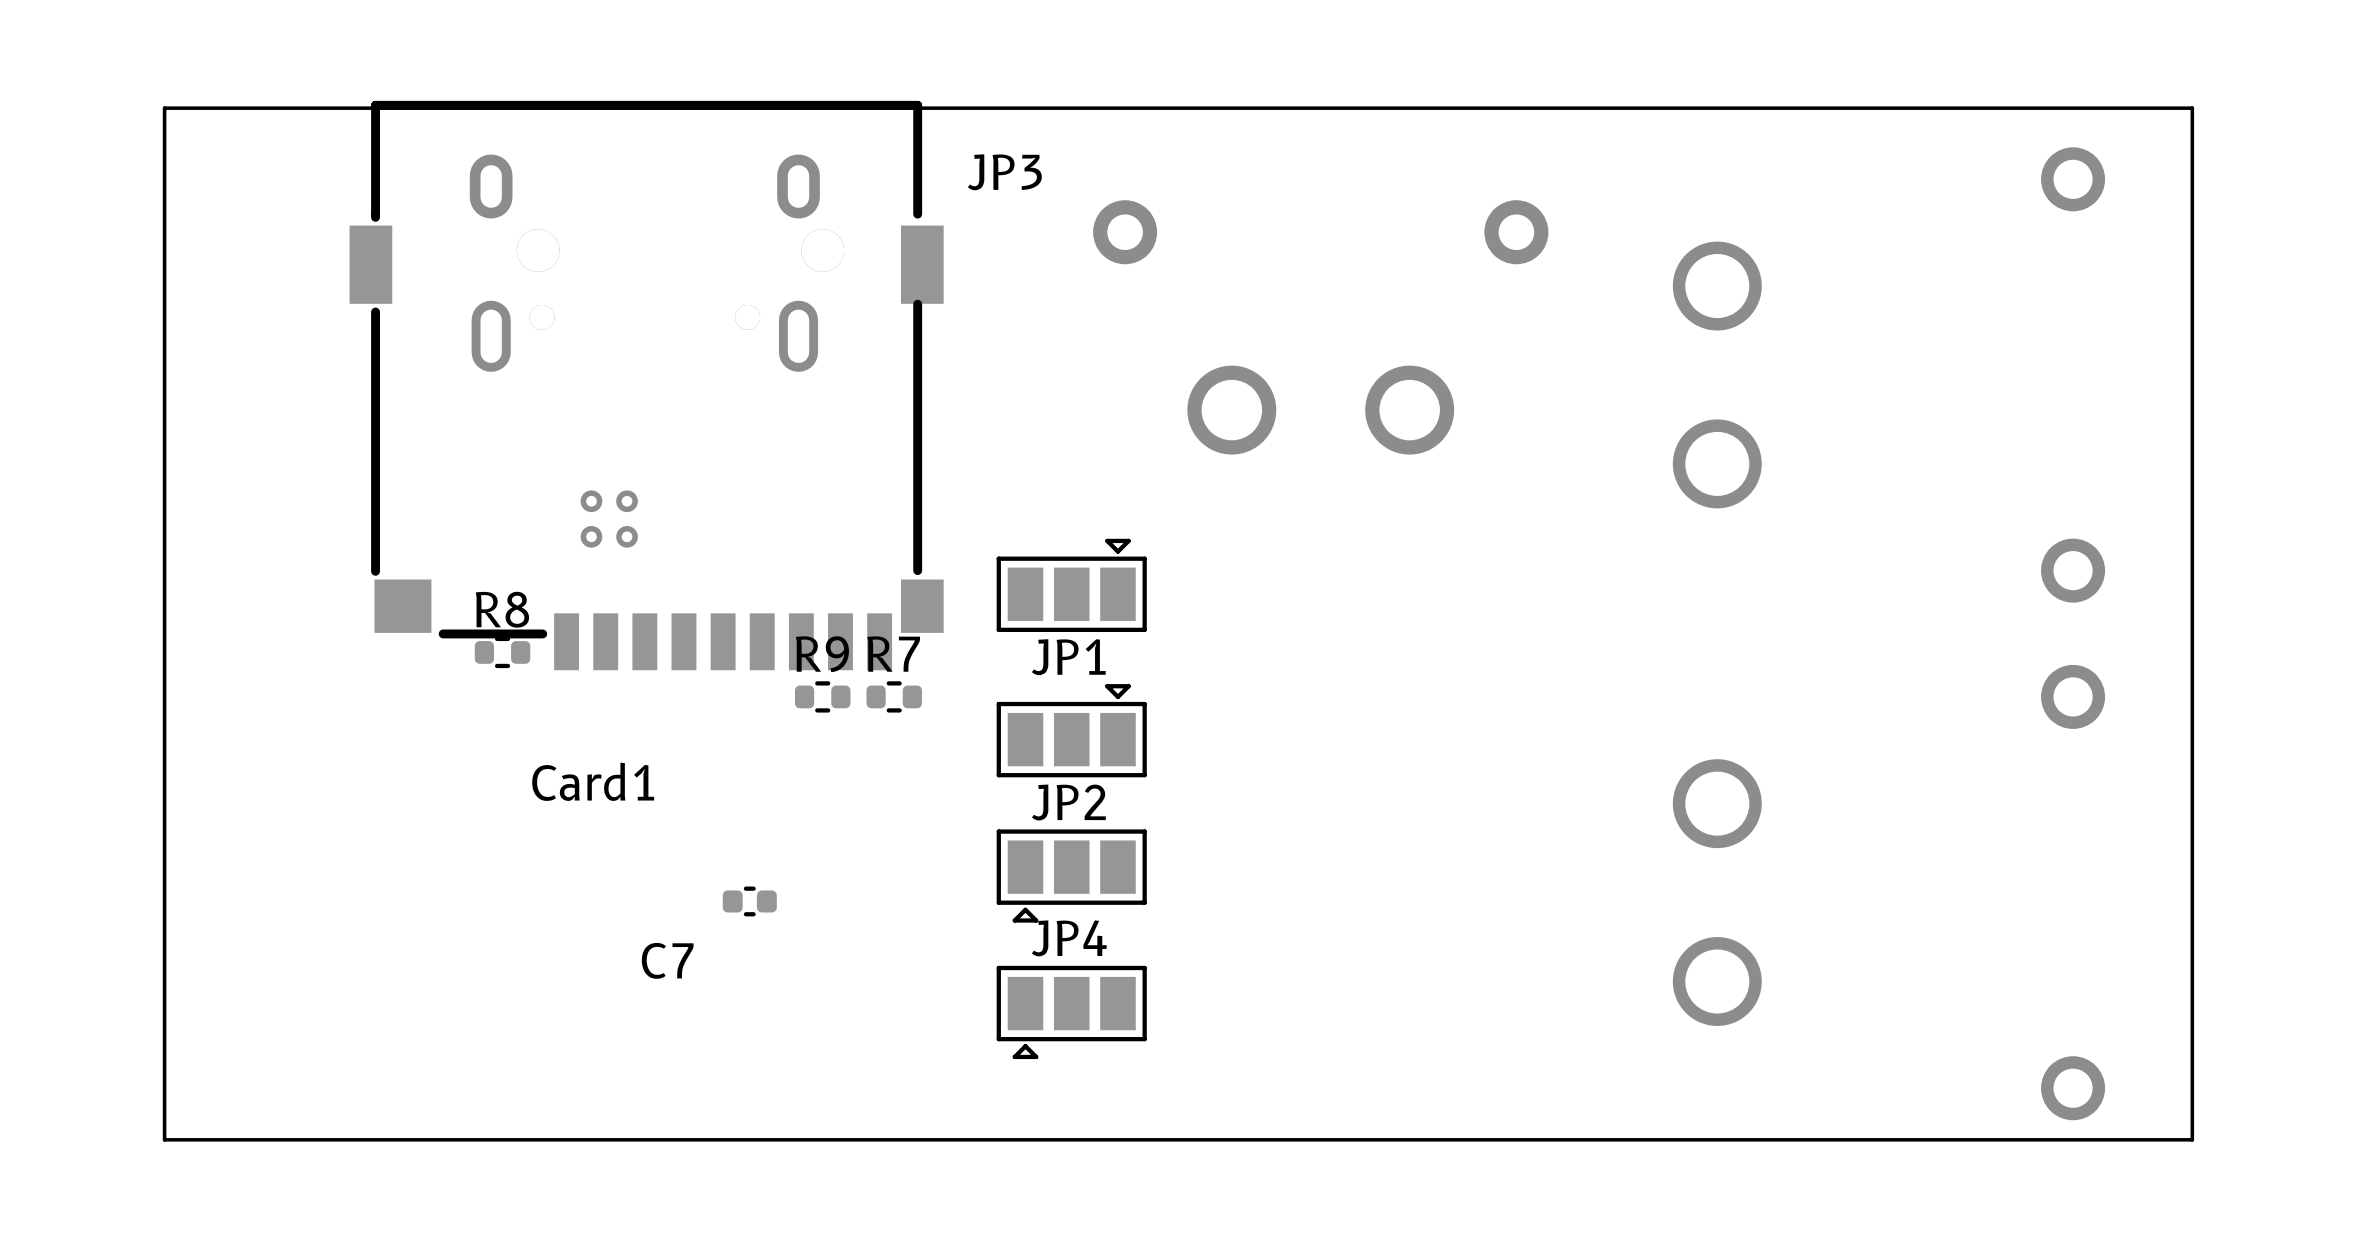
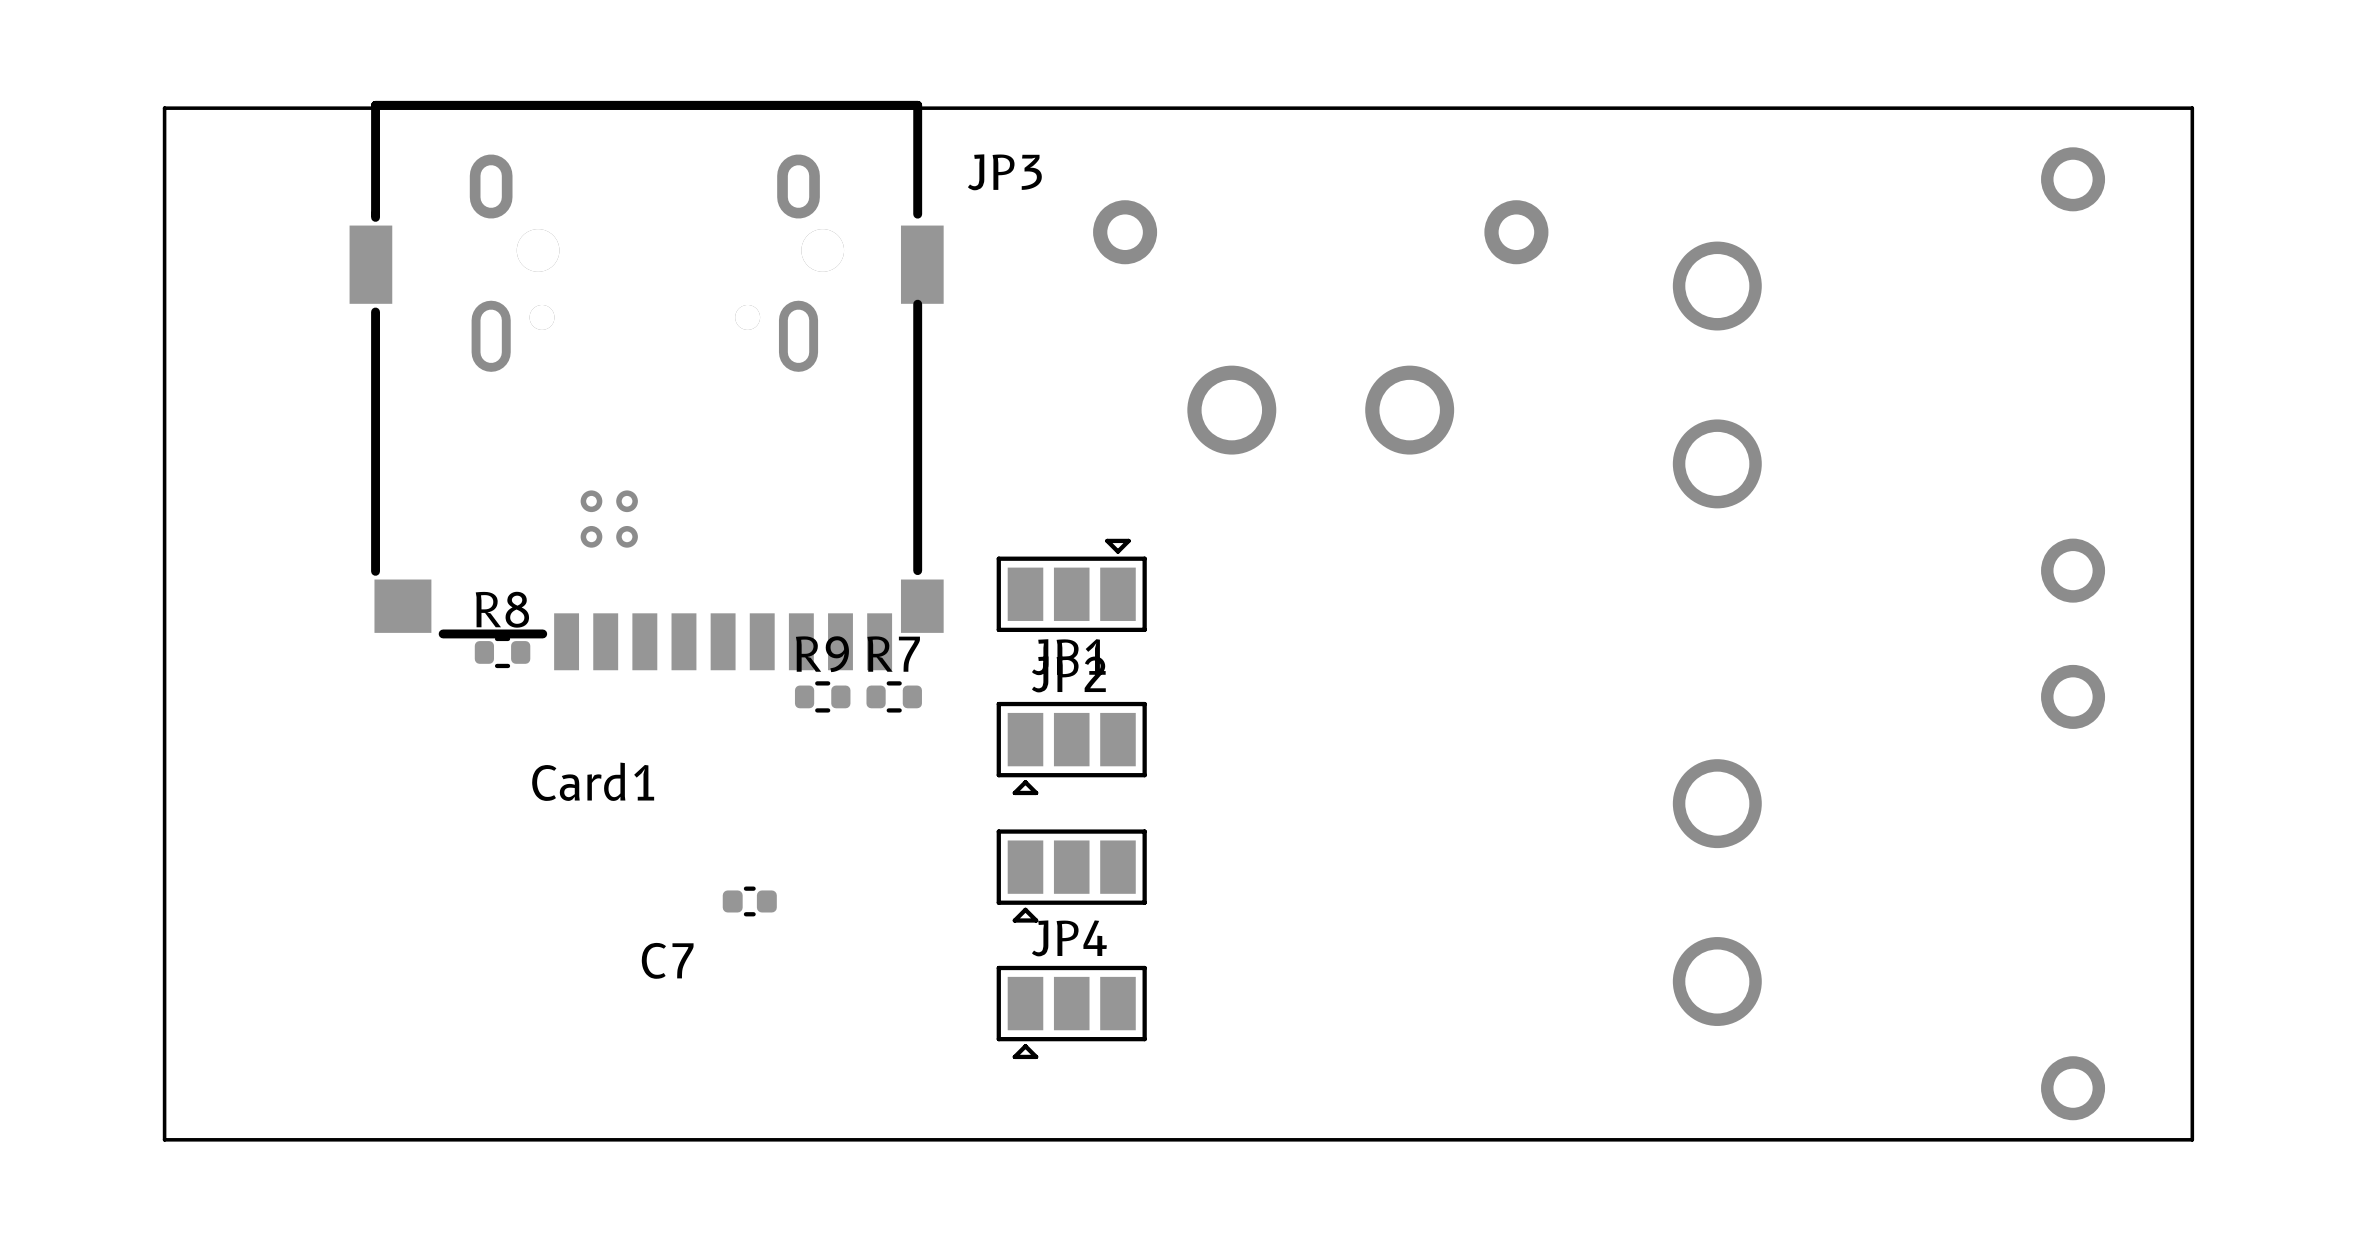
JP2 rotation: 0° (1071, 730) -> 180° (1071, 748)

